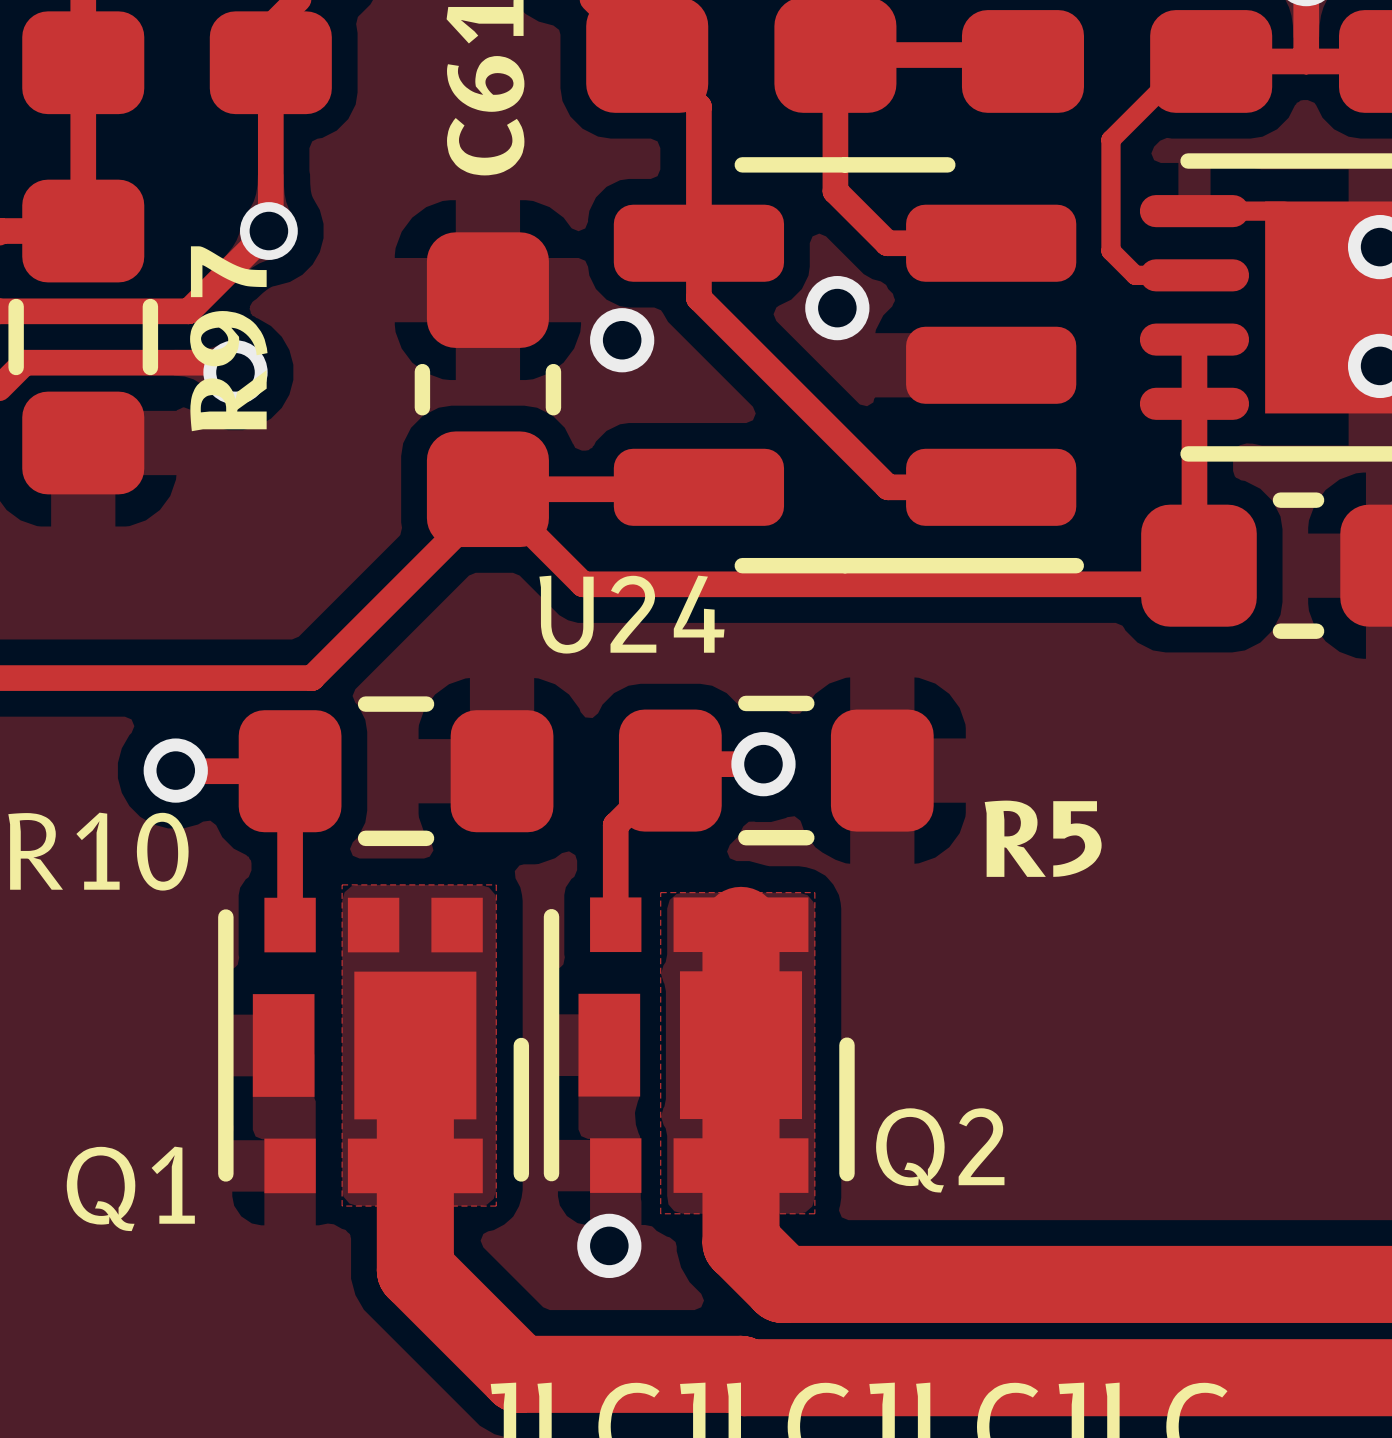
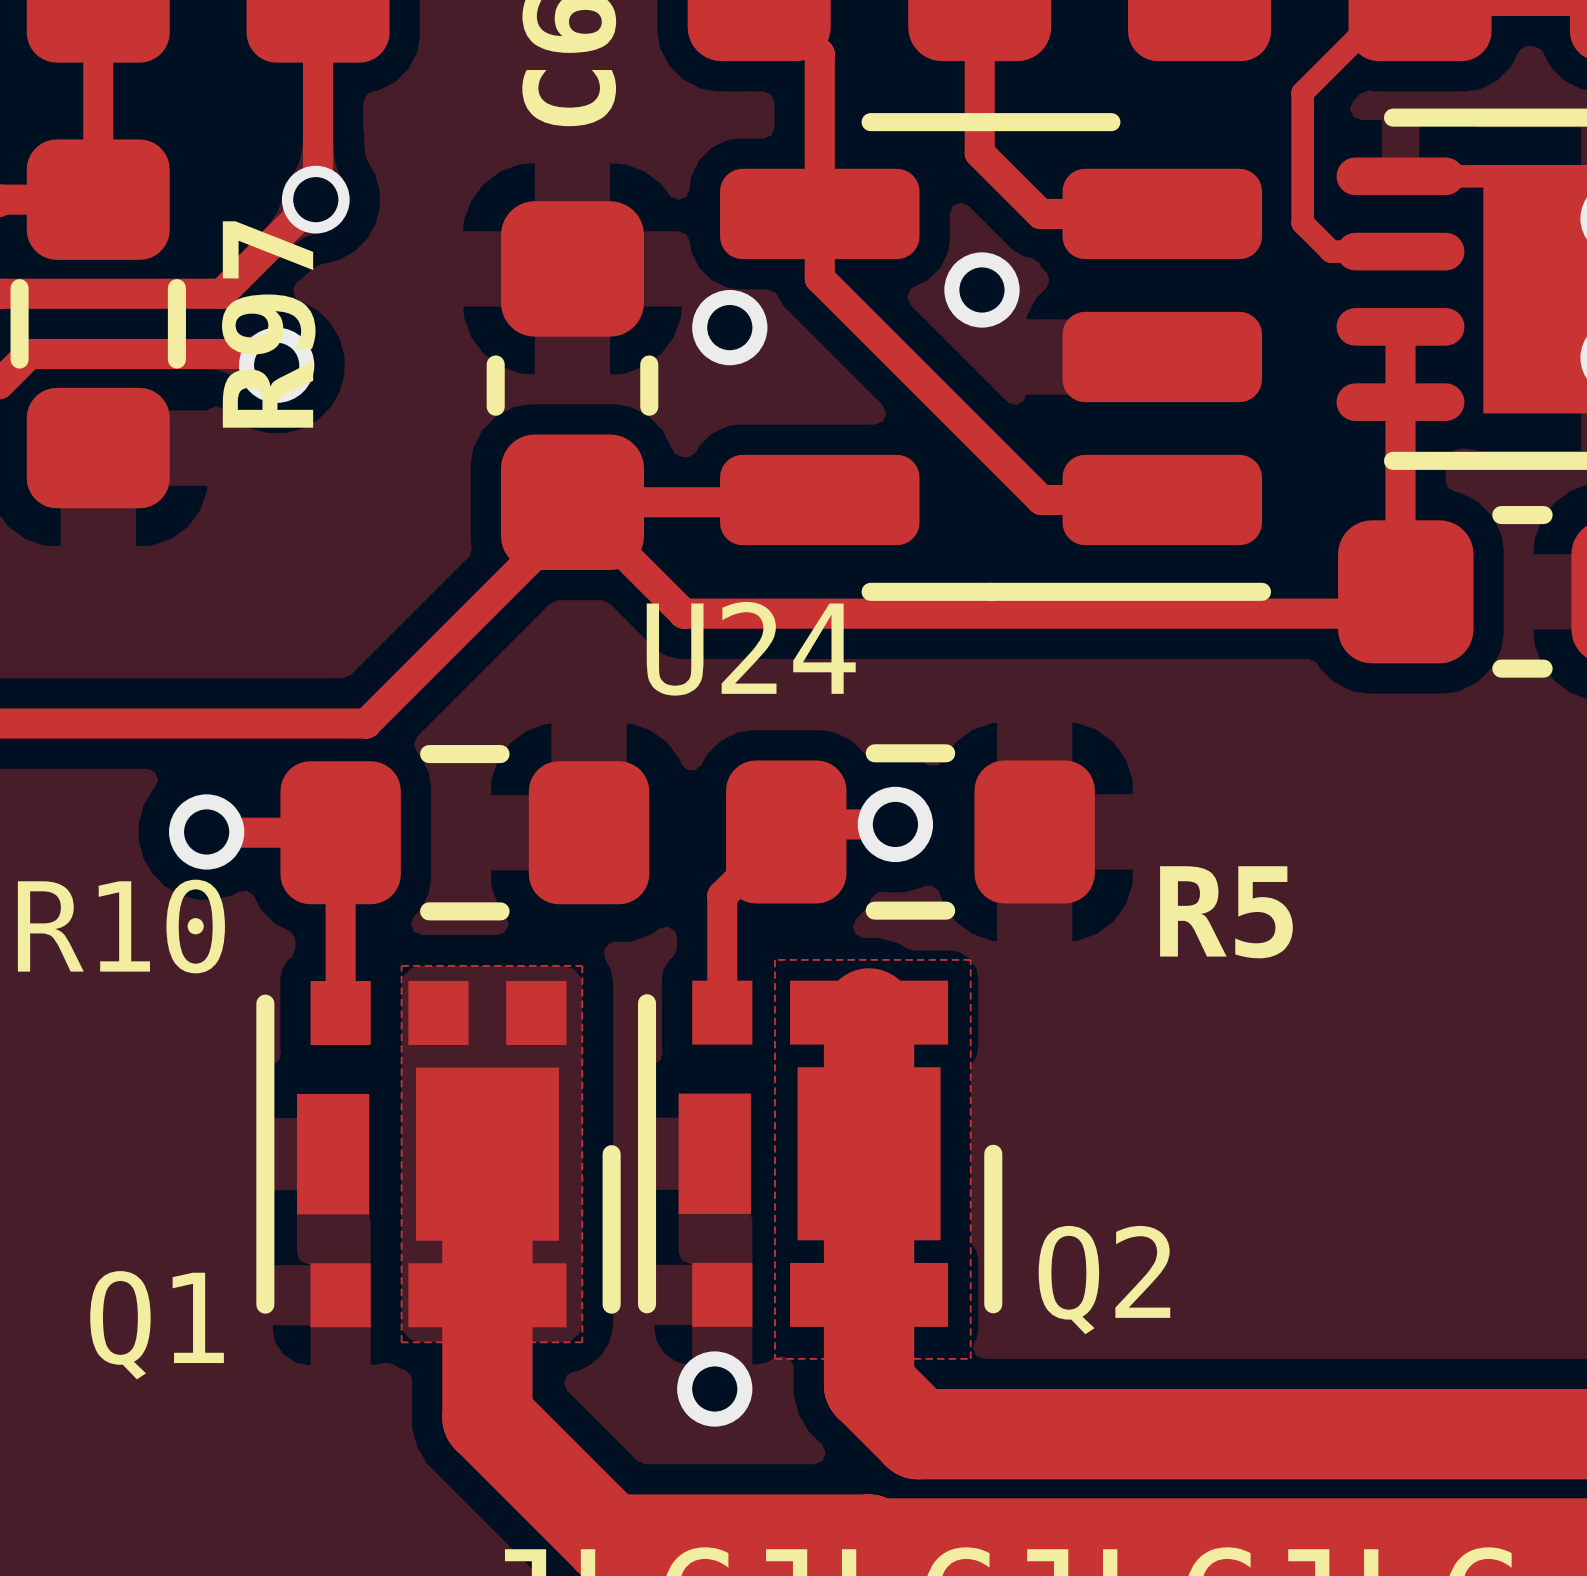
zone outline: (660, 892) (814, 892) (814, 1213) (660, 1213) -> (774, 974) (774, 959) (970, 959) (970, 1358) (774, 1358) (774, 1351)

